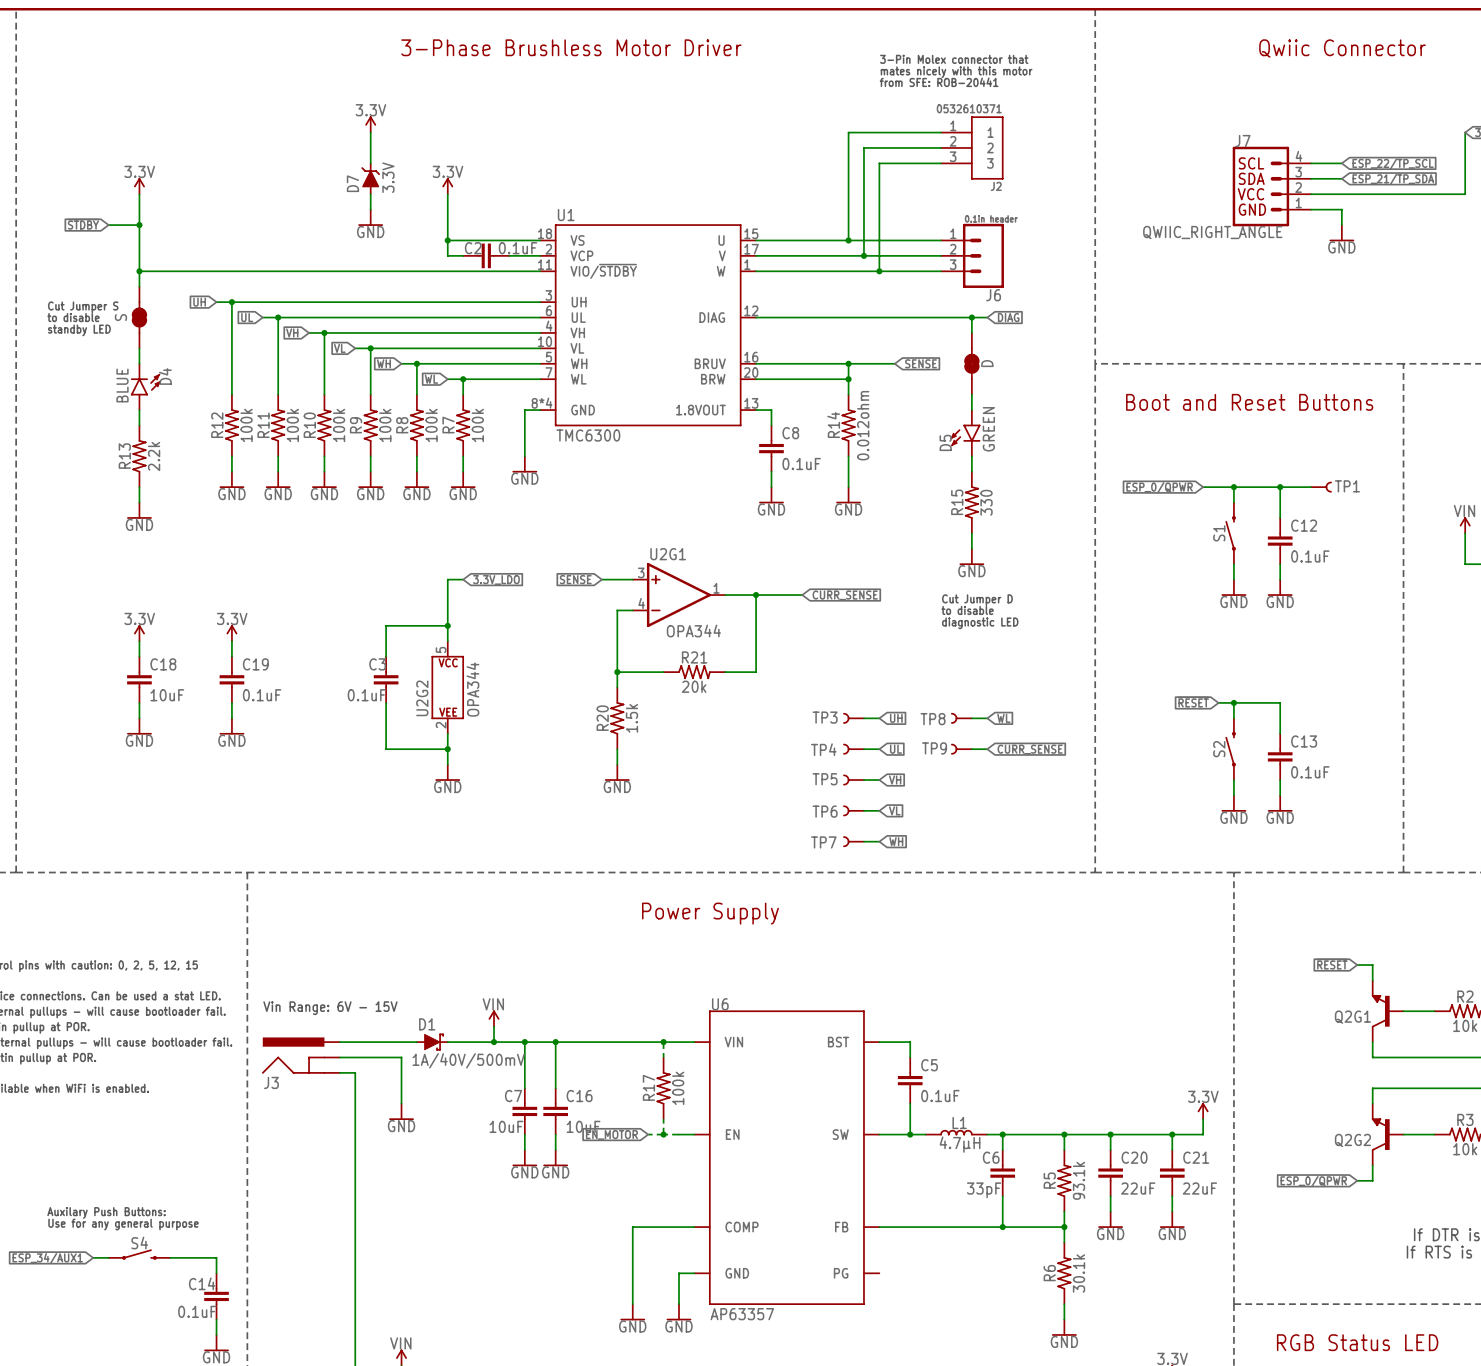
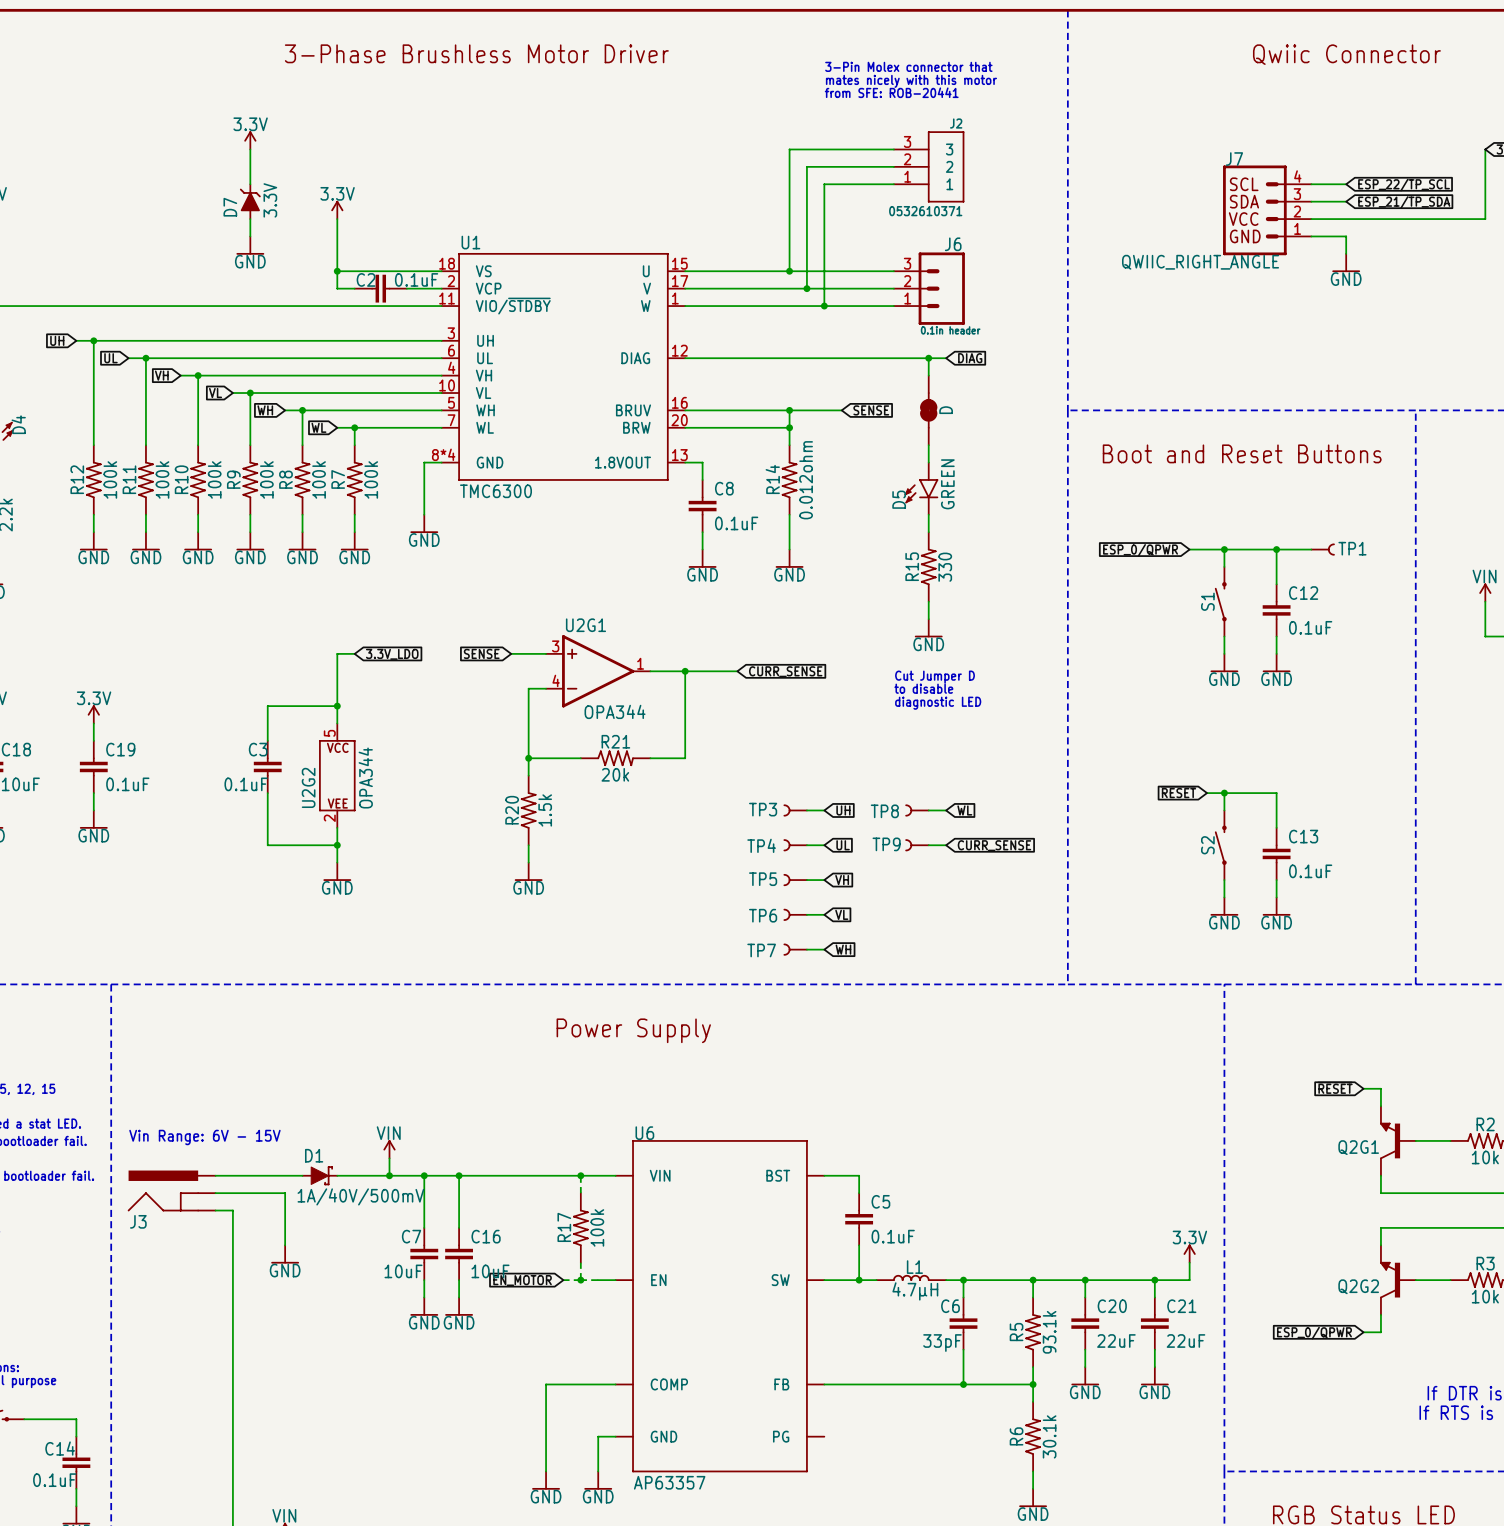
J2 flip: as is (987, 147) -> up-down (946, 166)
J6 flip: as is (983, 255) -> up-down (941, 288)

